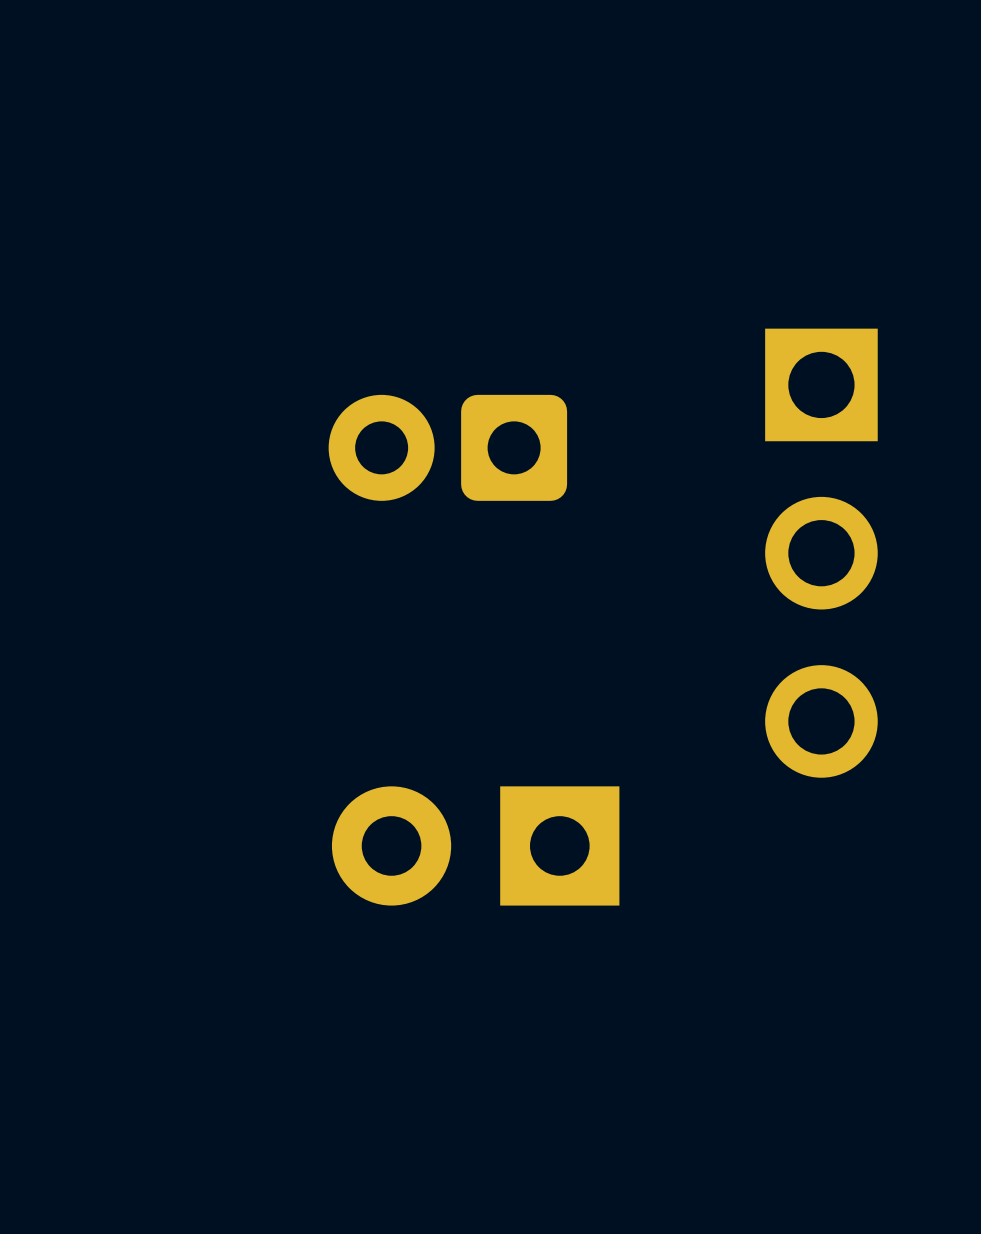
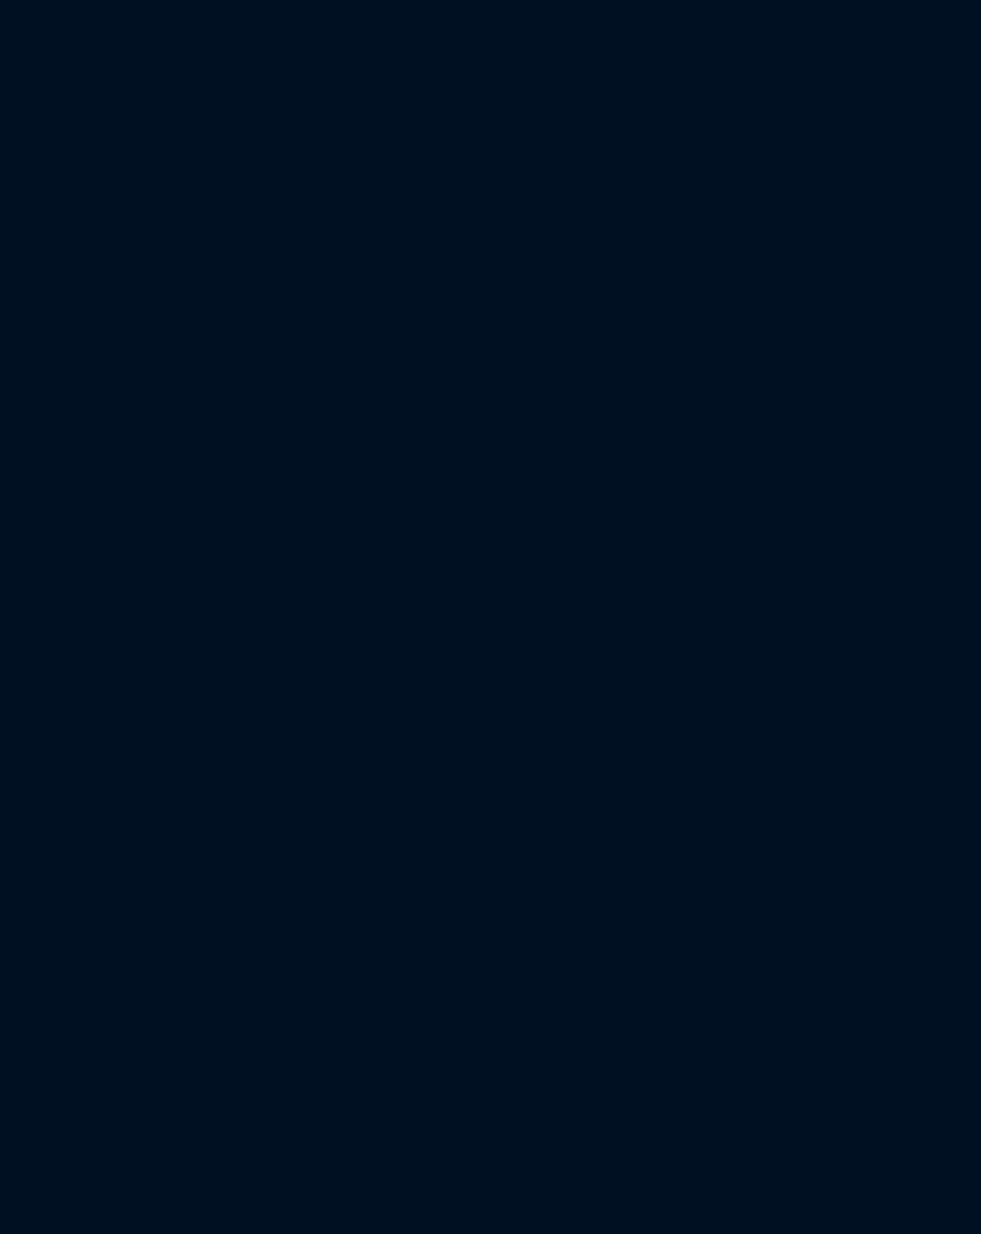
part: (447, 447) -> none
part: (821, 553) -> none
part: (475, 845) -> none

